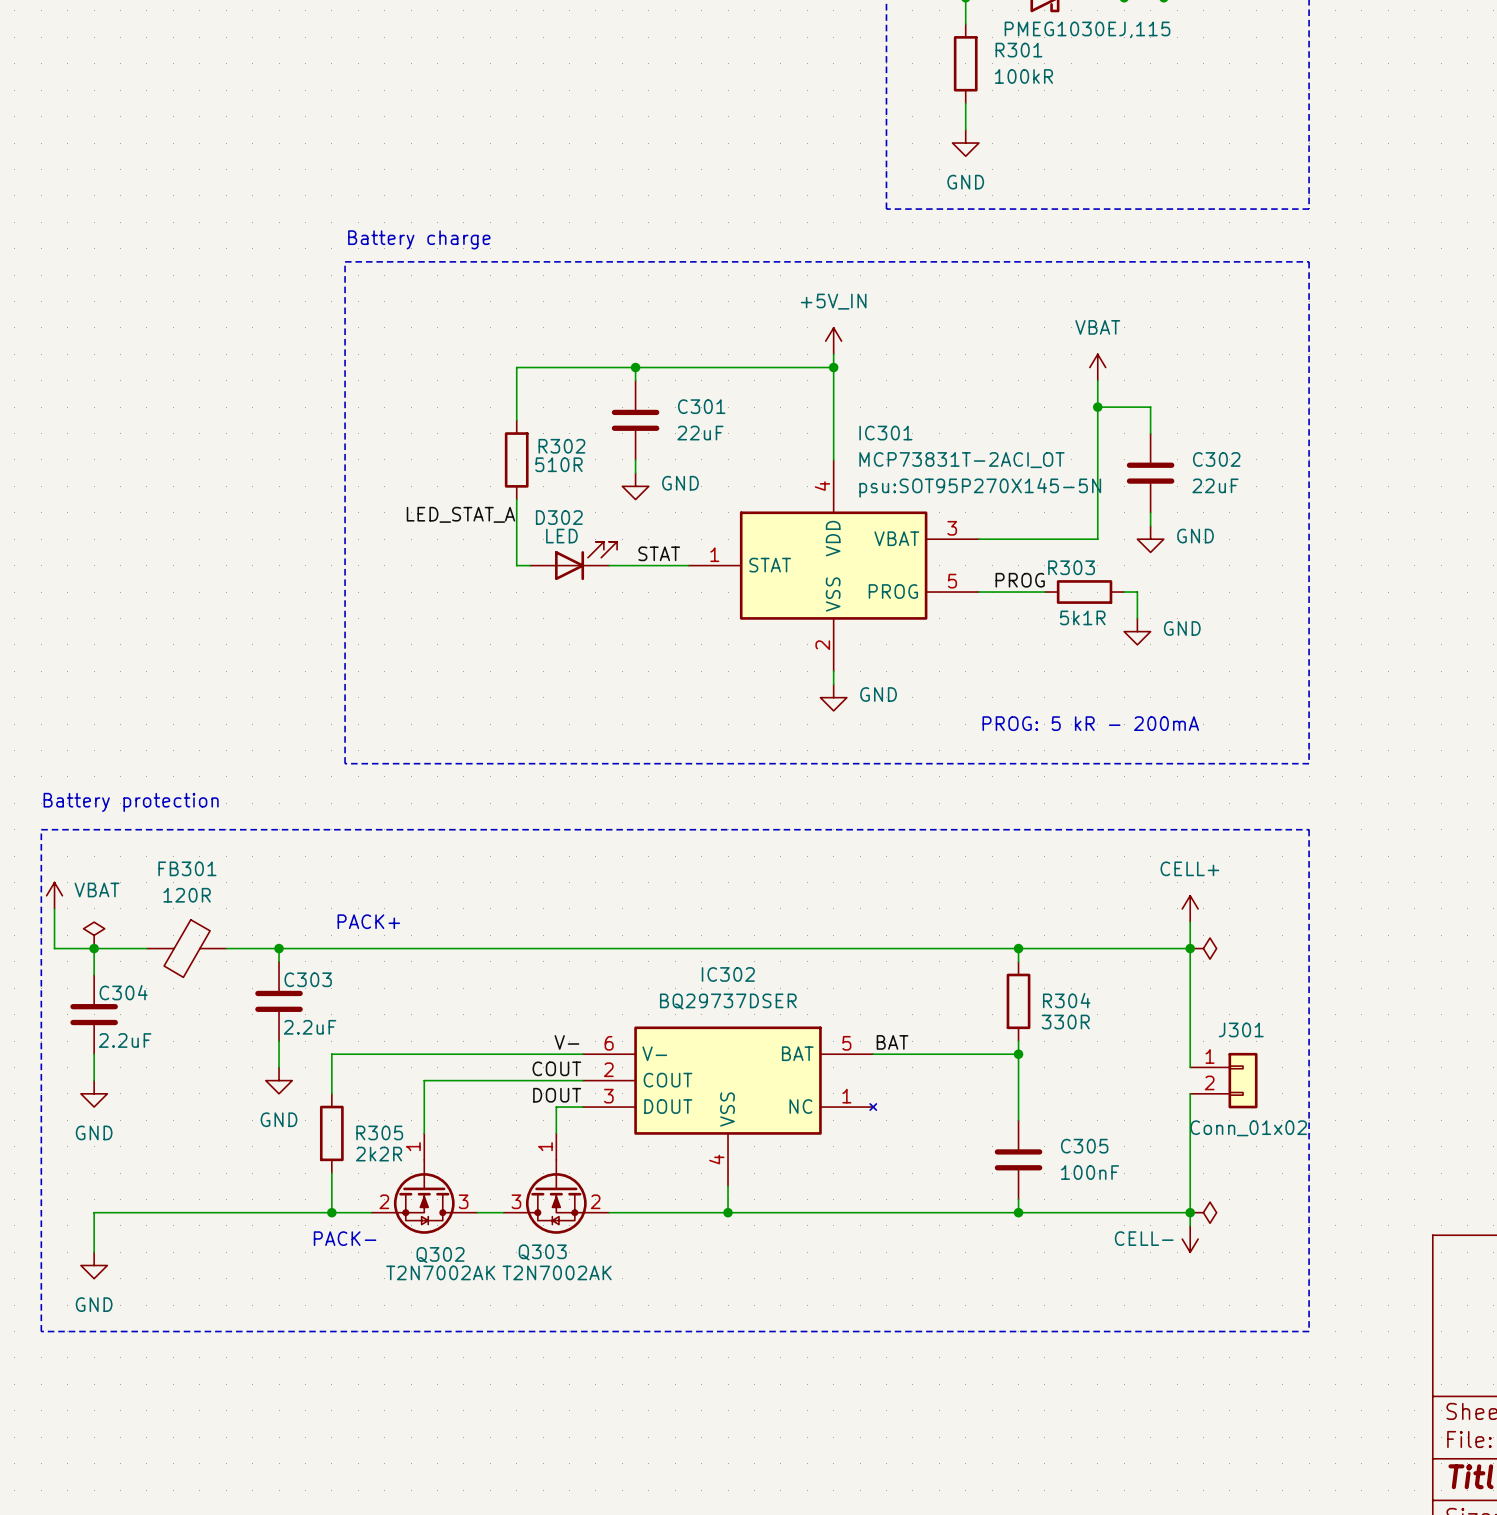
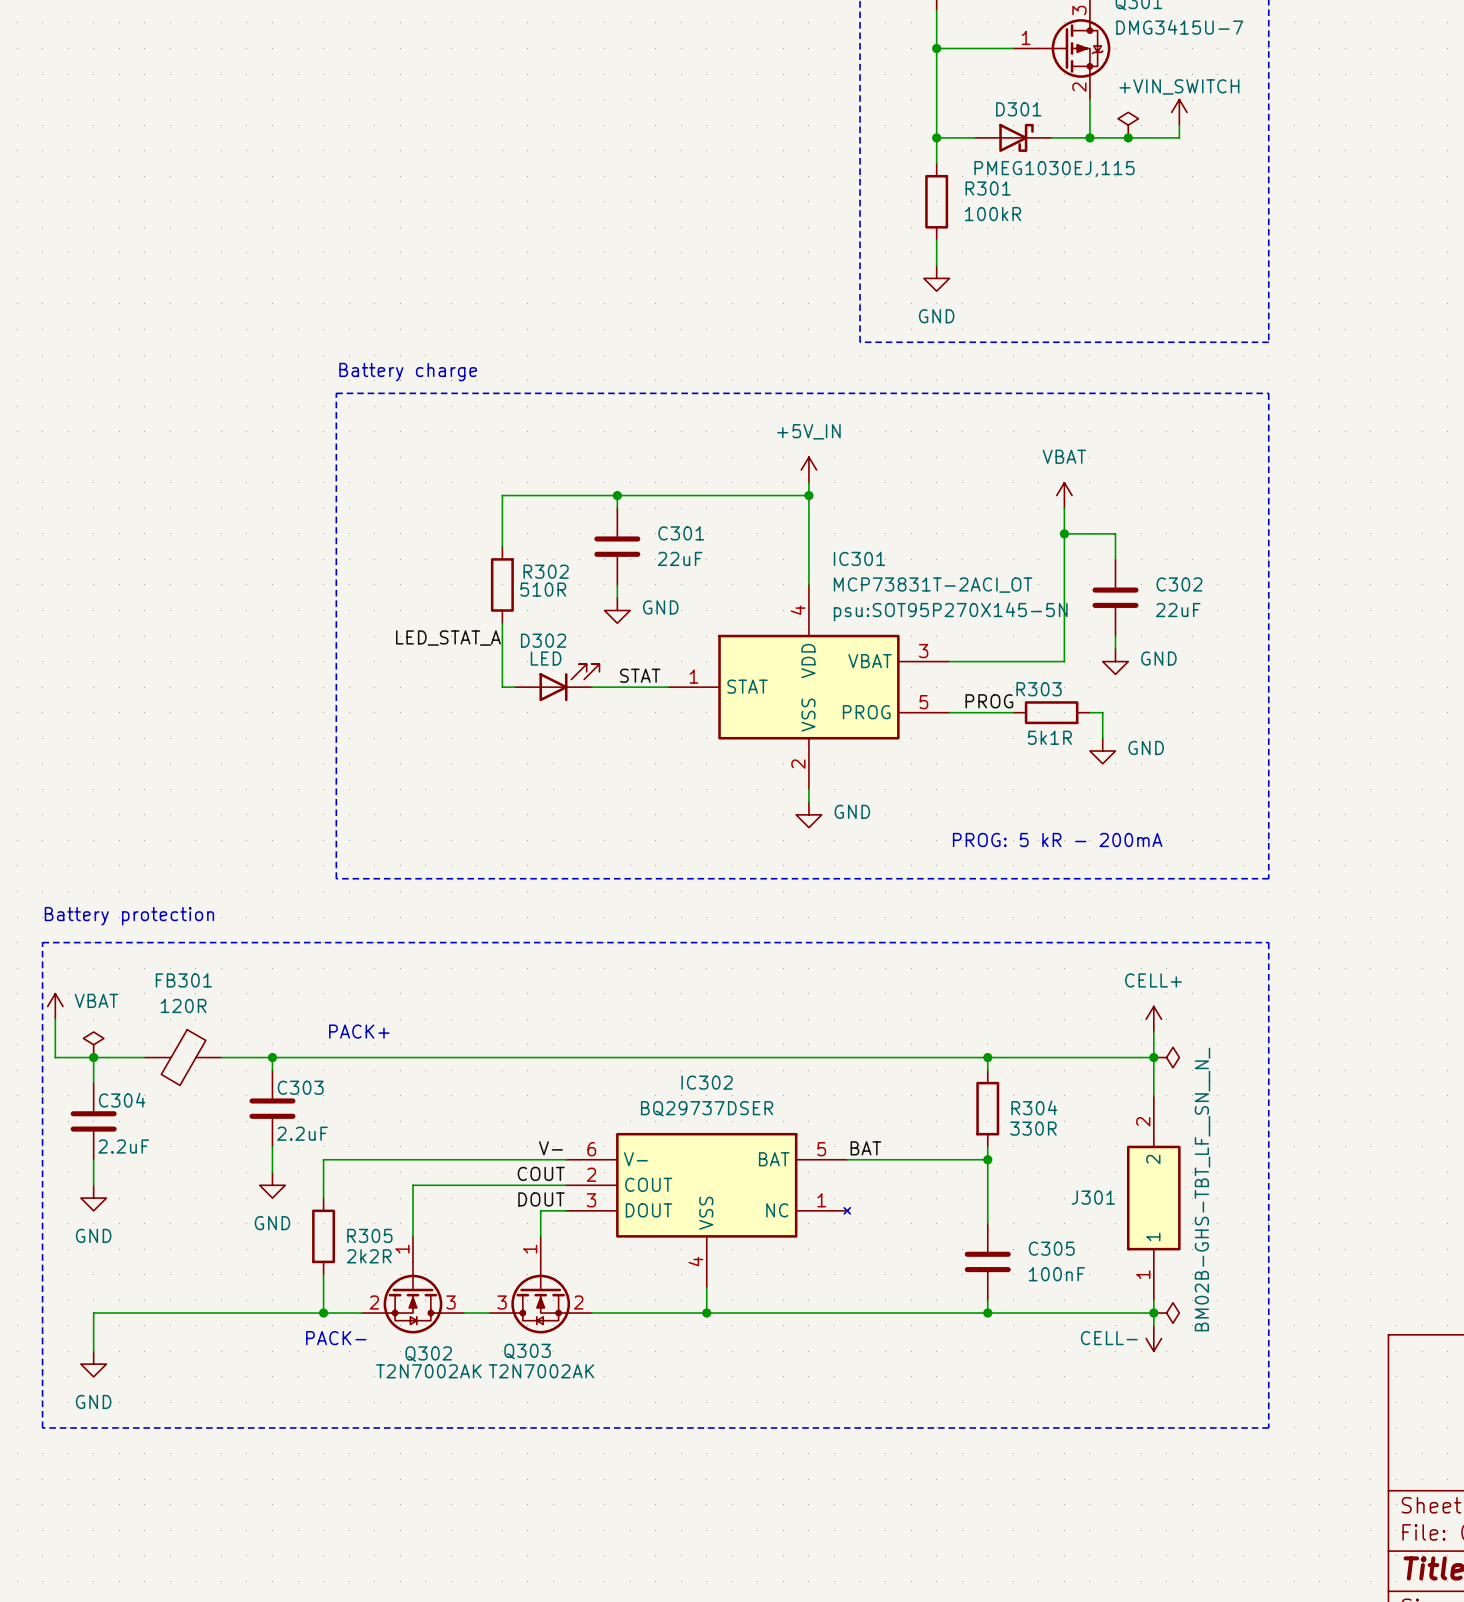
J301 name position: J301 (1241, 1029) -> J301 (1093, 1197)
J301 symbol: [1190, 1052, 1258, 1109] -> [1126, 1095, 1181, 1301]
J301 value: Conn_01x02 (1248, 1128) -> BM02B-GHS-TBT_LF__SN__N_ (1202, 1189)

